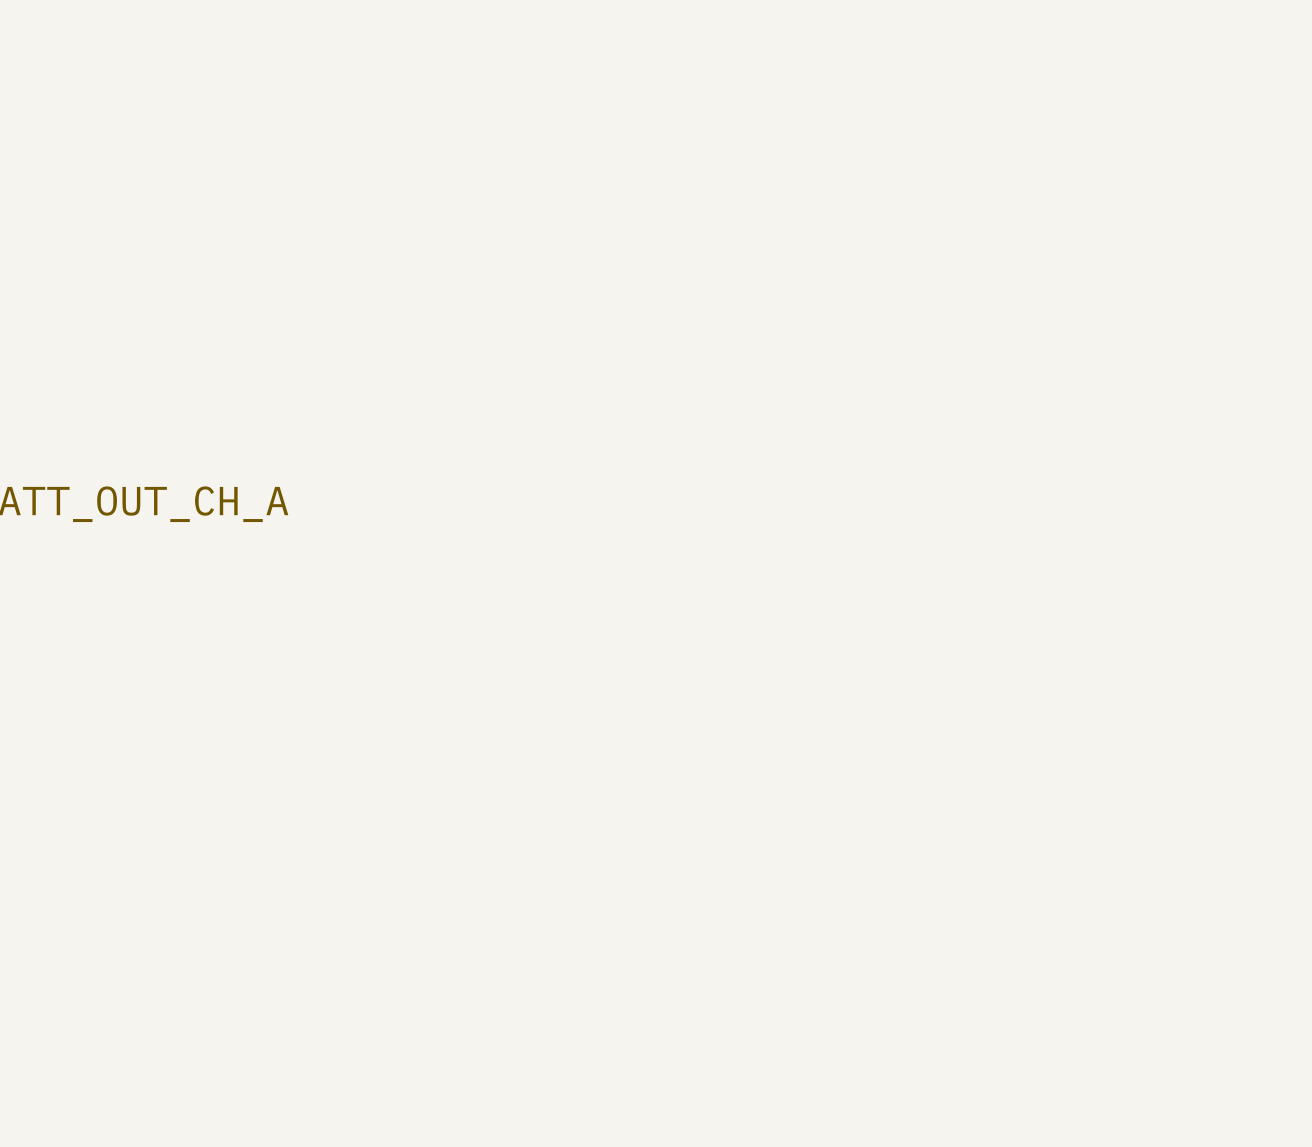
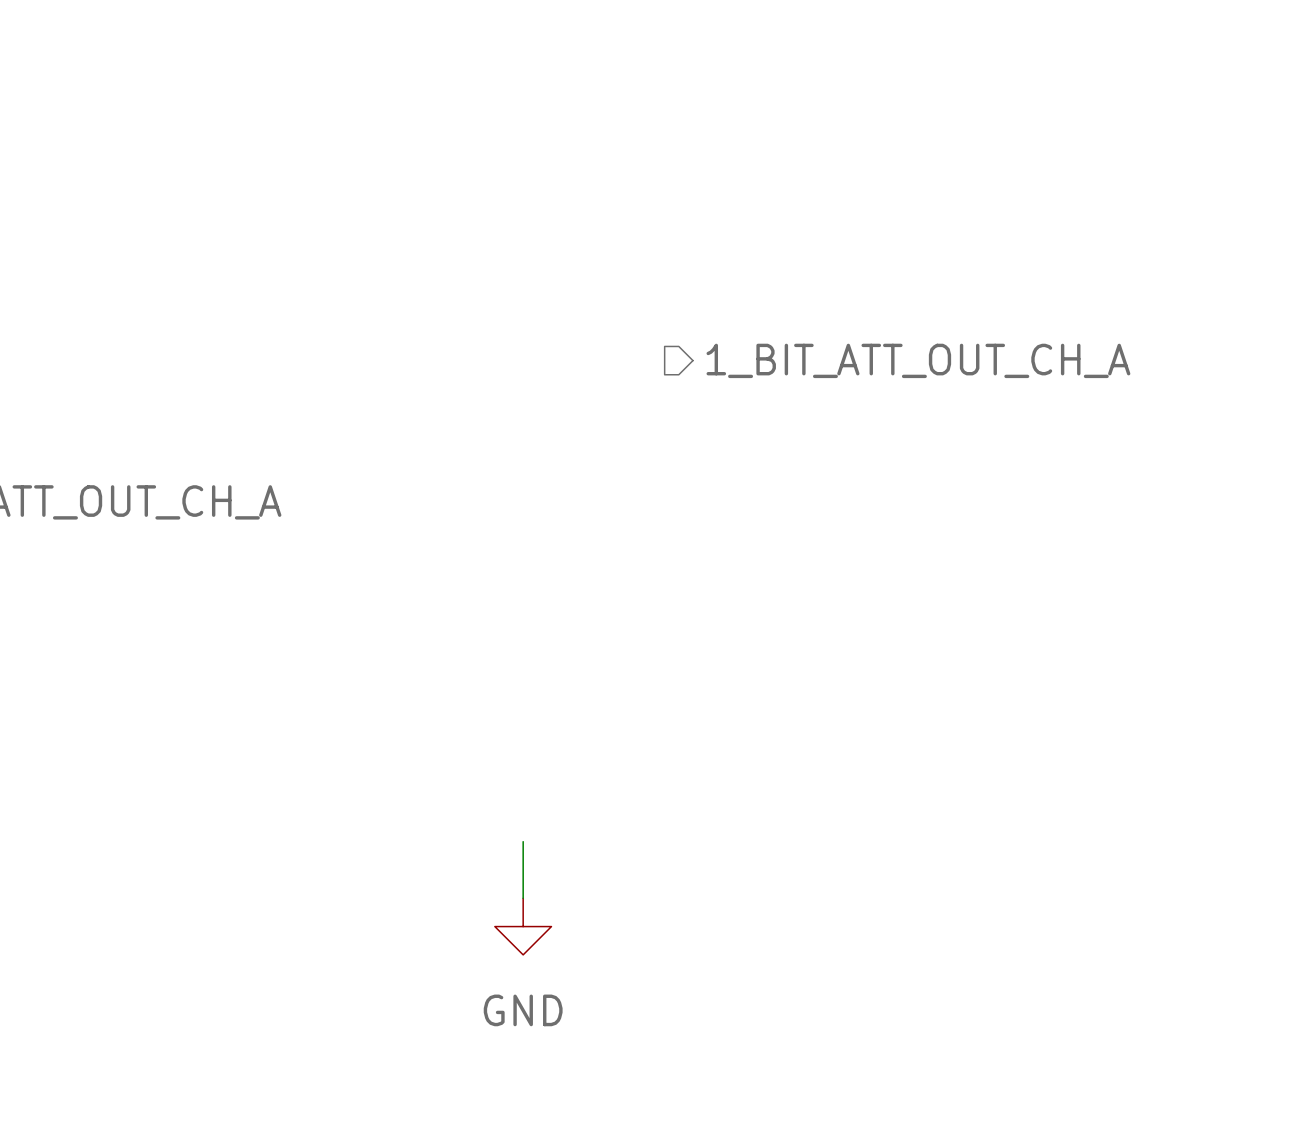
hierarchical label: none -> 1_BIT_ATT_OUT_CH_A (918, 360)
wire: none -> (523, 841) (523, 898)
power symbol: none -> GND (523, 926)

